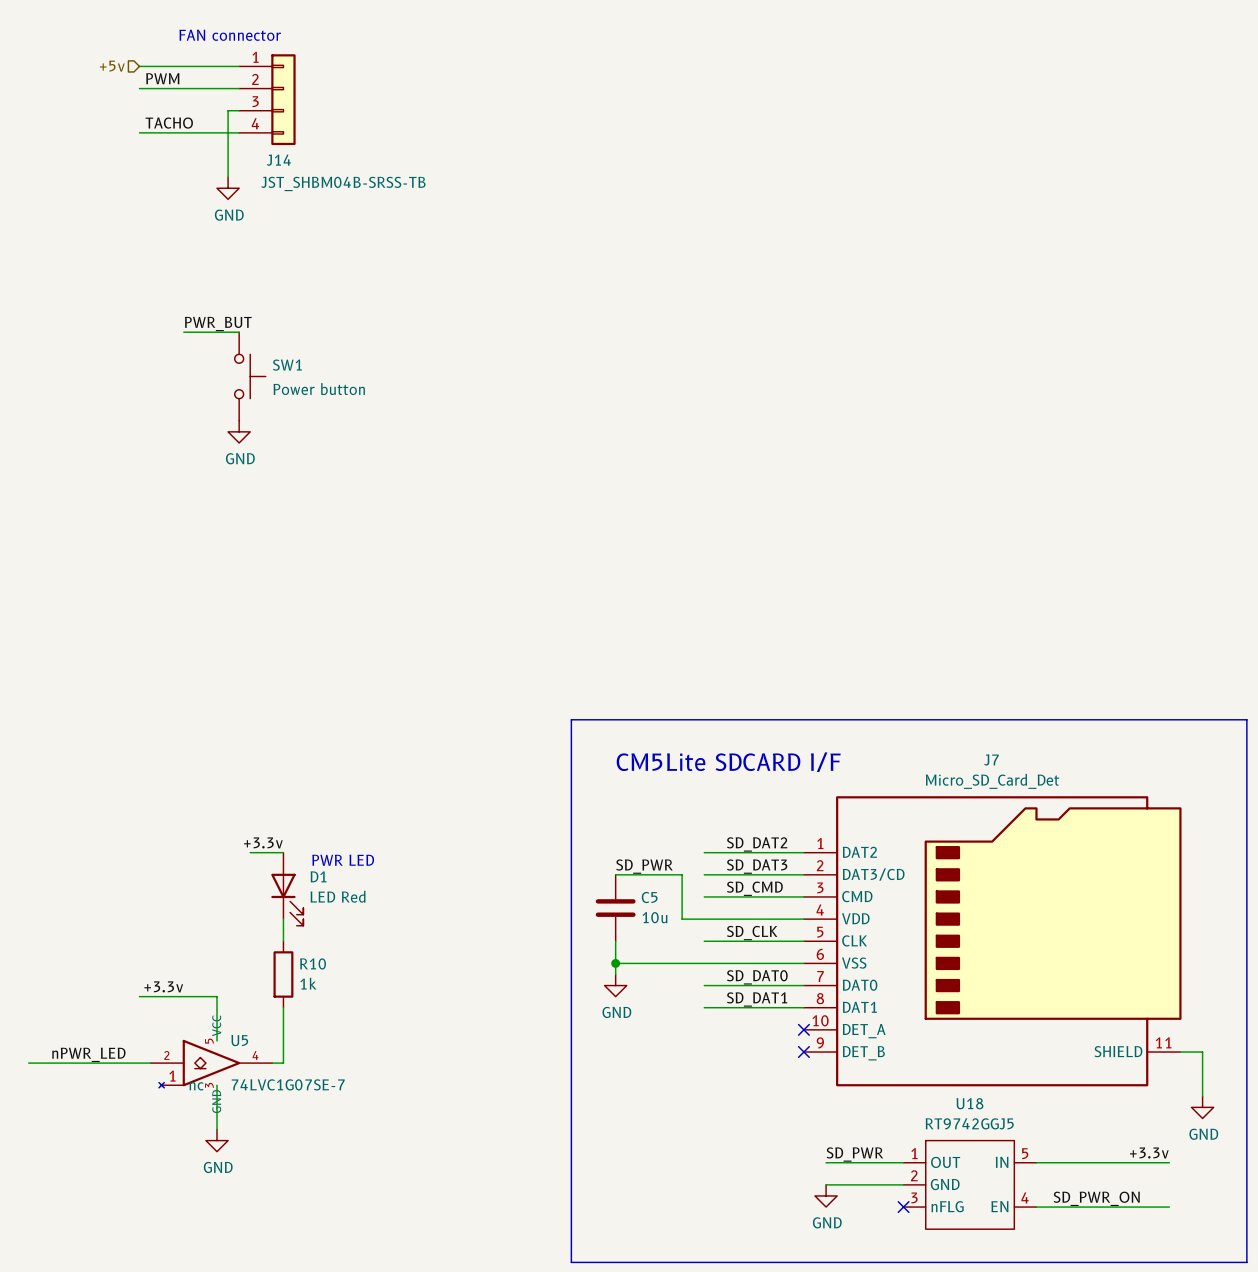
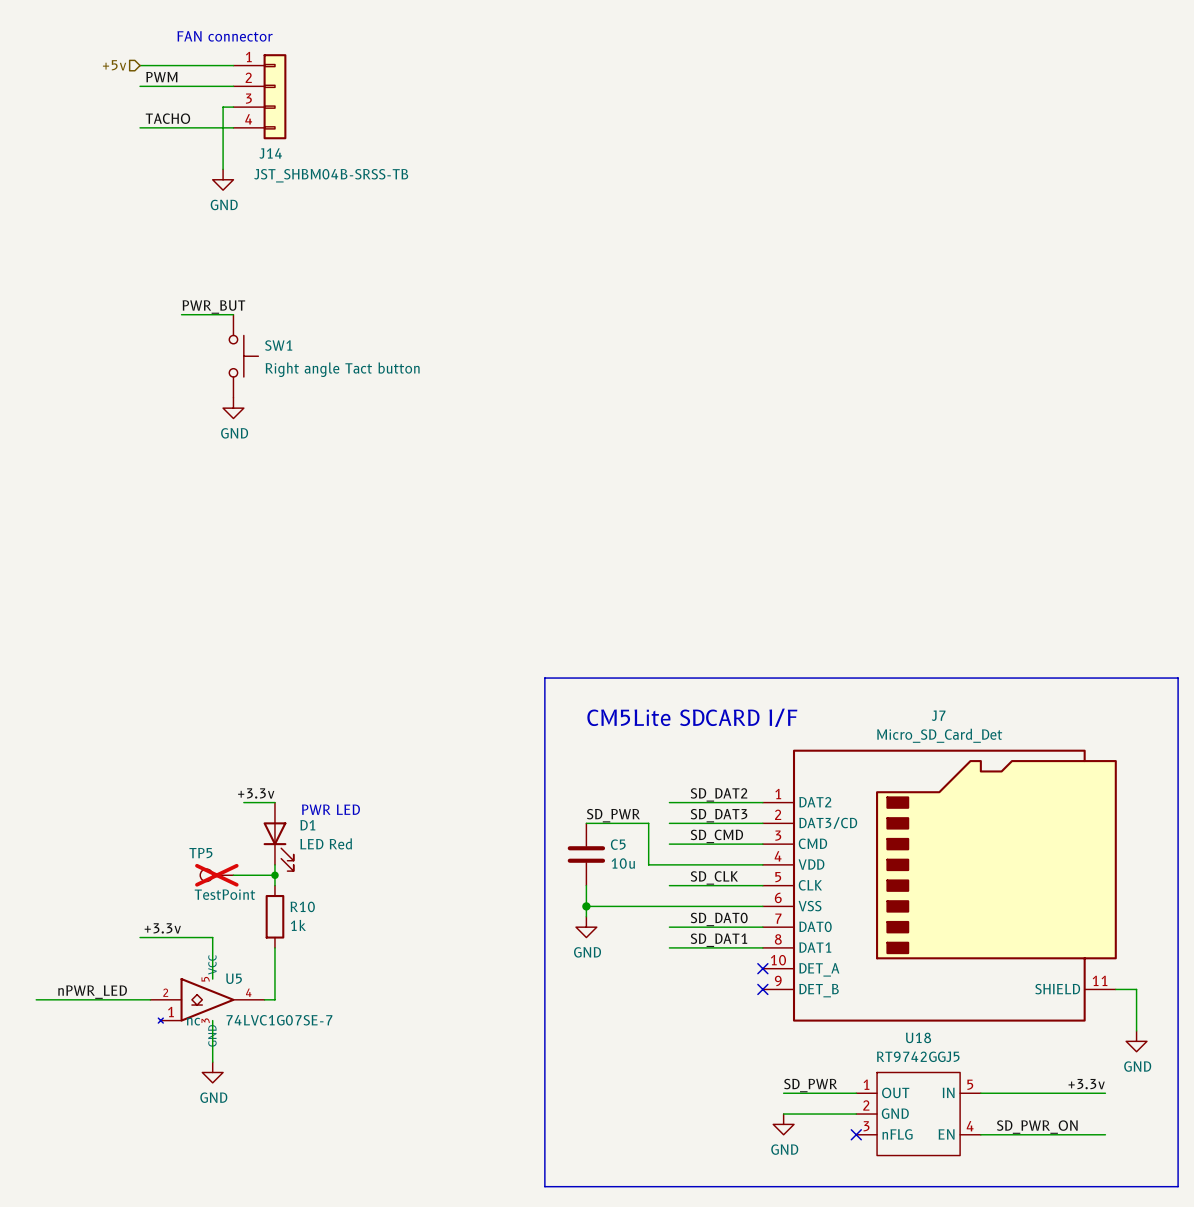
SW1 value: Power button (319, 389) -> Right angle Tact button (342, 369)
TP5: none -> TestPoint (216, 875)
wire: none -> (233, 875) (274, 875)
junction: none -> (274, 875)

